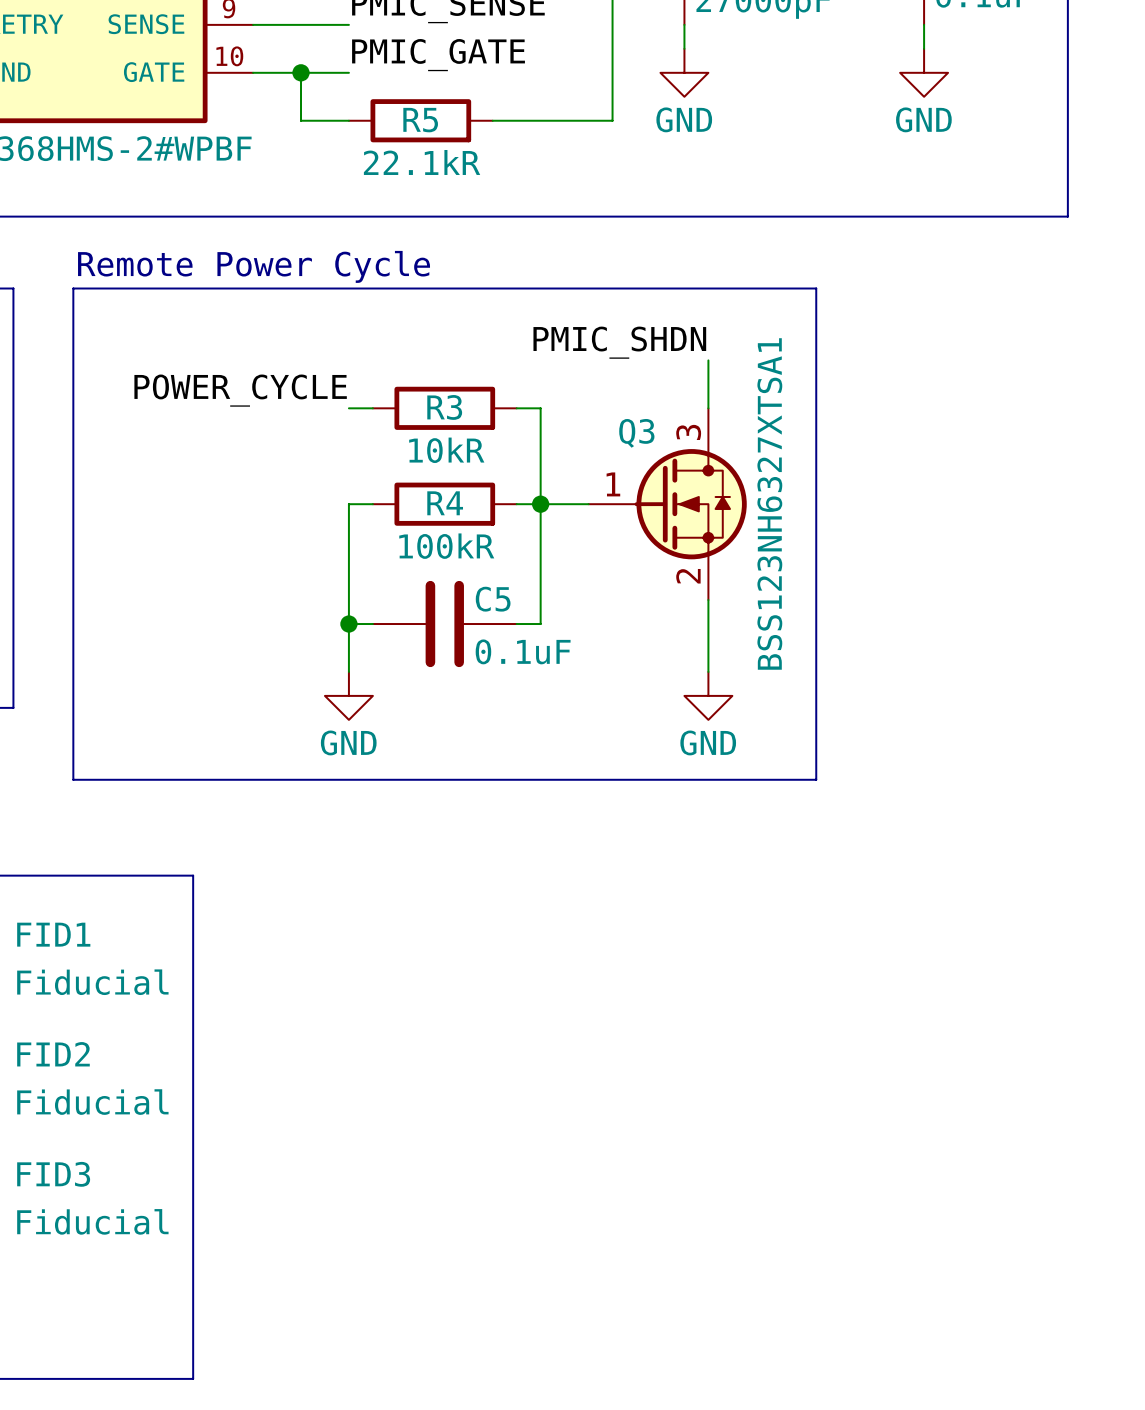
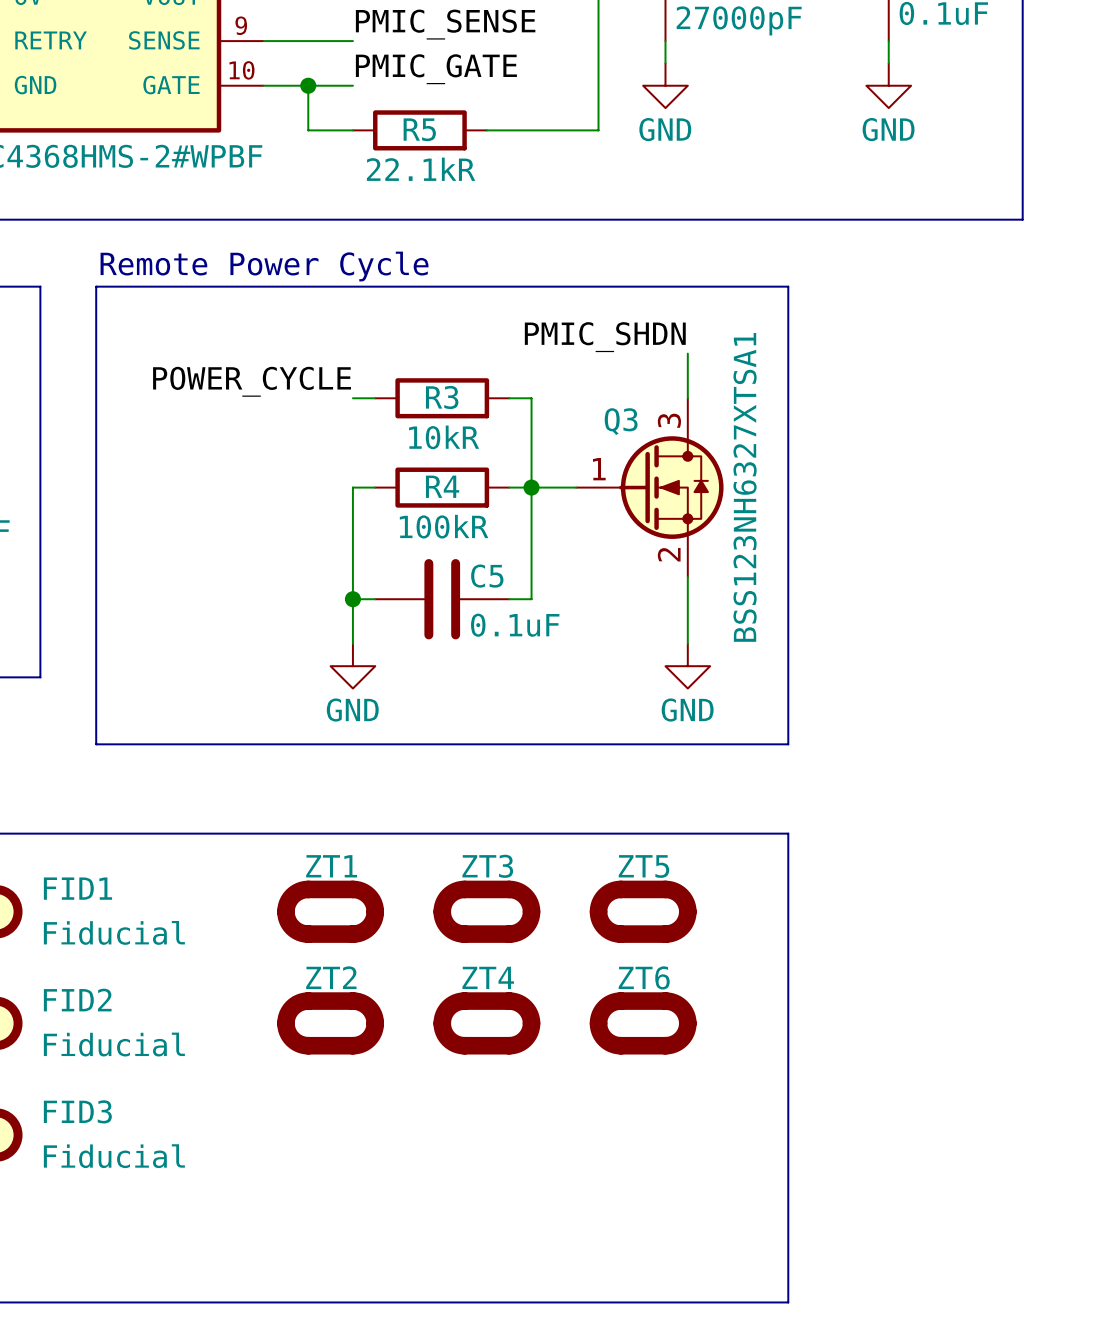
line: (193, 875) (193, 1378) -> (207, 833) (788, 833) (788, 1302) (207, 1302)
ZT1: none -> (330, 911)
ZT3: none -> (486, 911)
ZT5: none -> (643, 911)
ZT2: none -> (330, 1023)
ZT4: none -> (486, 1023)
ZT6: none -> (643, 1023)

